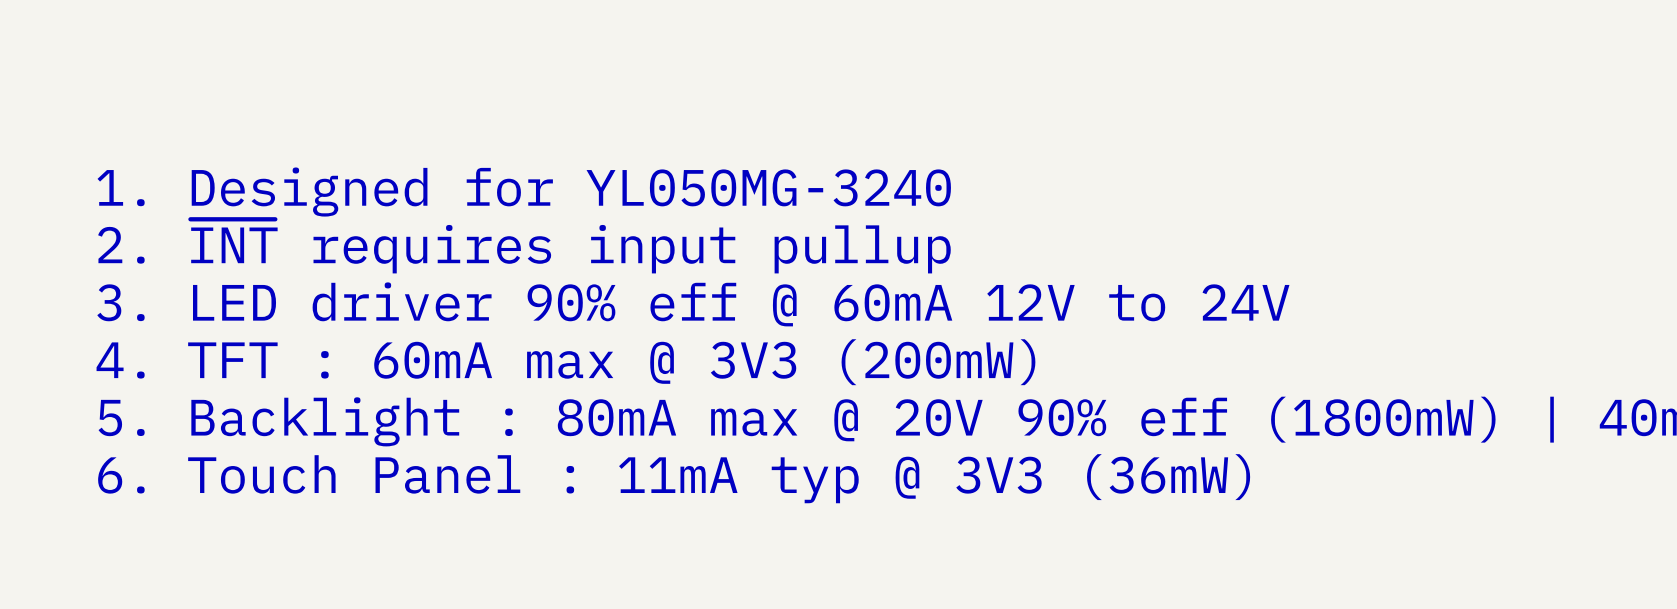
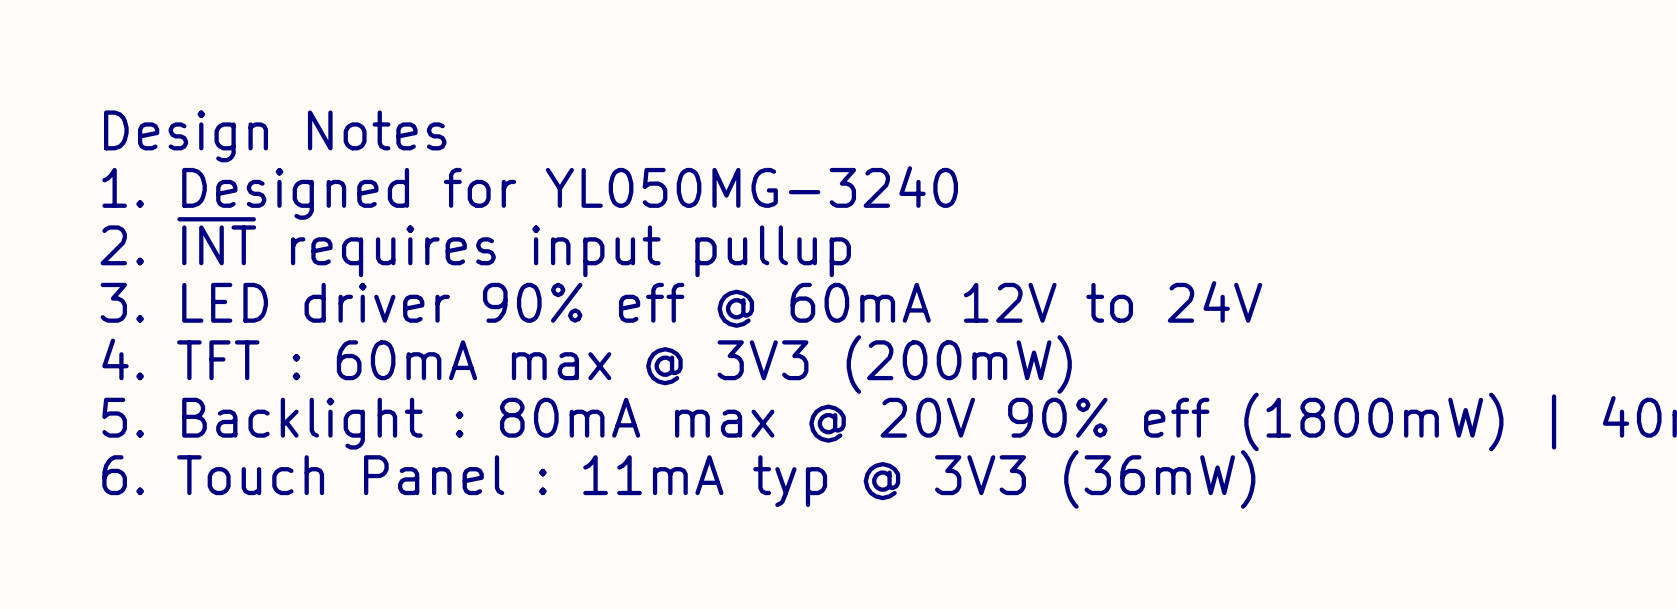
text: none -> Design Notes (275, 136)

